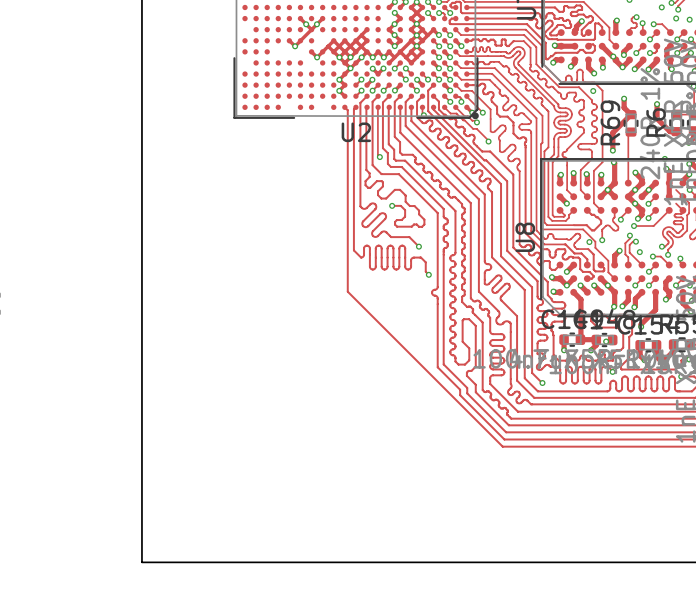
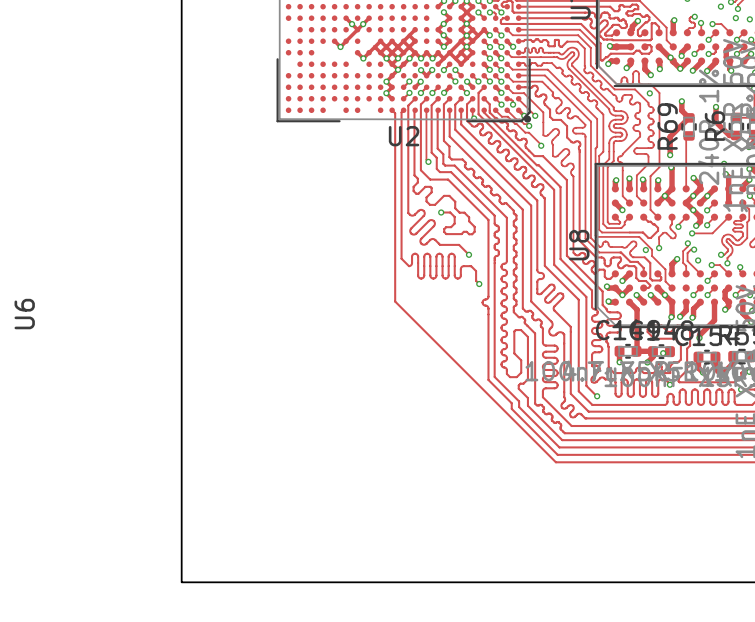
track: (676, 189) (682, 196) -> none
track: (676, 203) (682, 210) -> none

